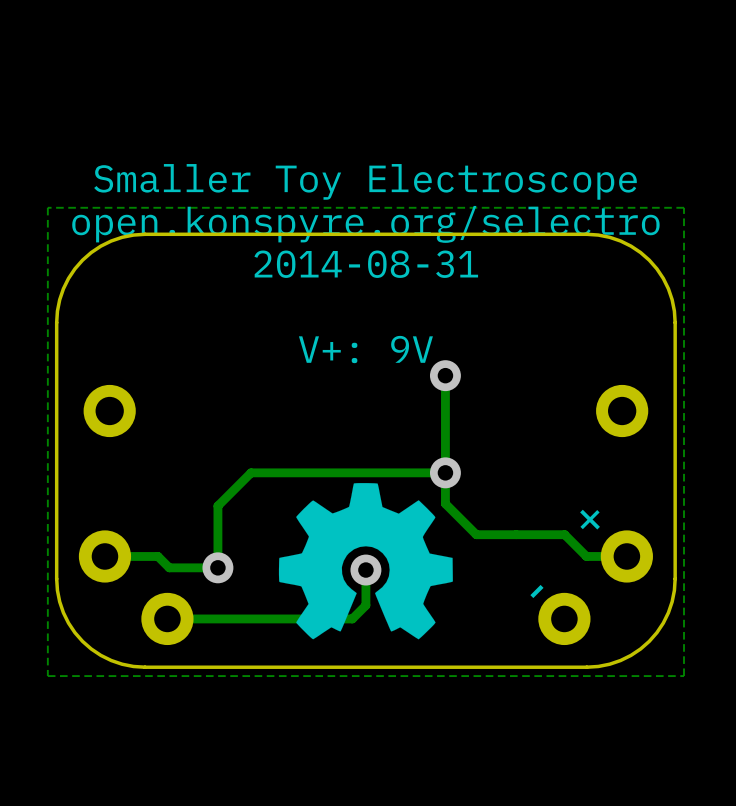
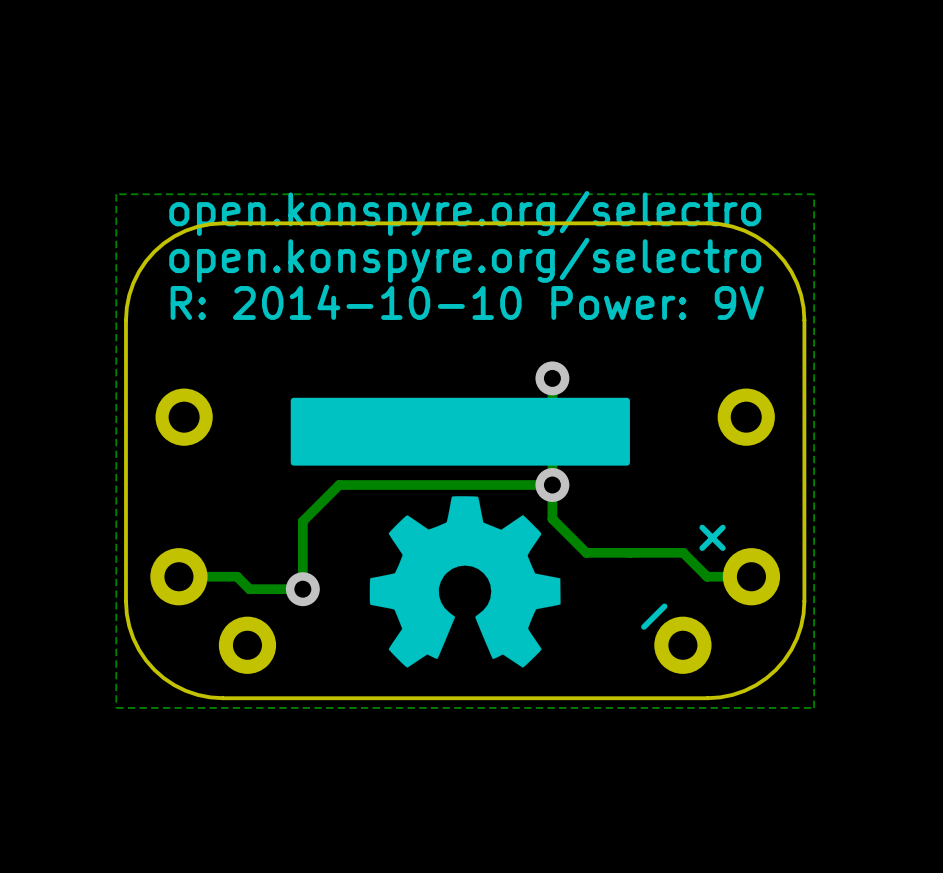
text: Smaller Toy Electroscope (365, 181) -> none
text: 2014-08-31 (366, 264) -> open.konspyre.org/selectro (465, 260)
text: none -> R: 2014-10-10 Power: 9V (467, 302)
text: V+: 9V (365, 349) -> none
drawing: none -> [290, 397, 630, 466]
track: (365, 570) (365, 605) (352, 618) (167, 618) -> none
via: (365, 570) -> none

